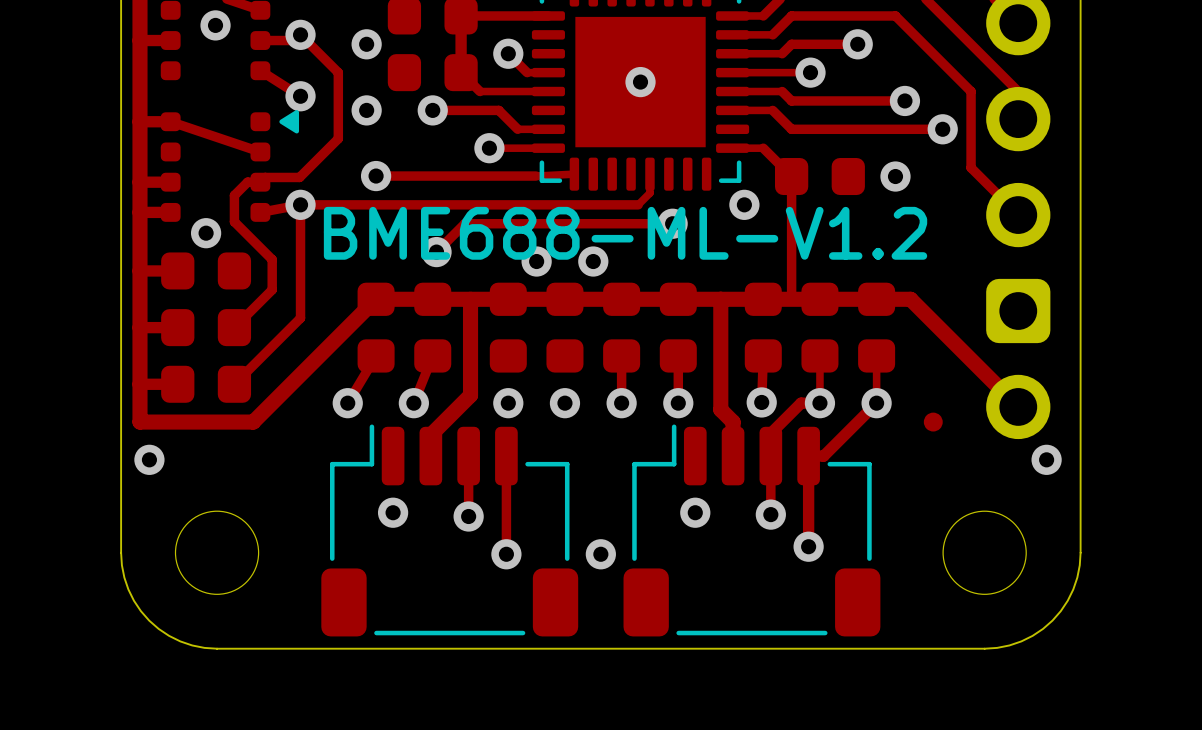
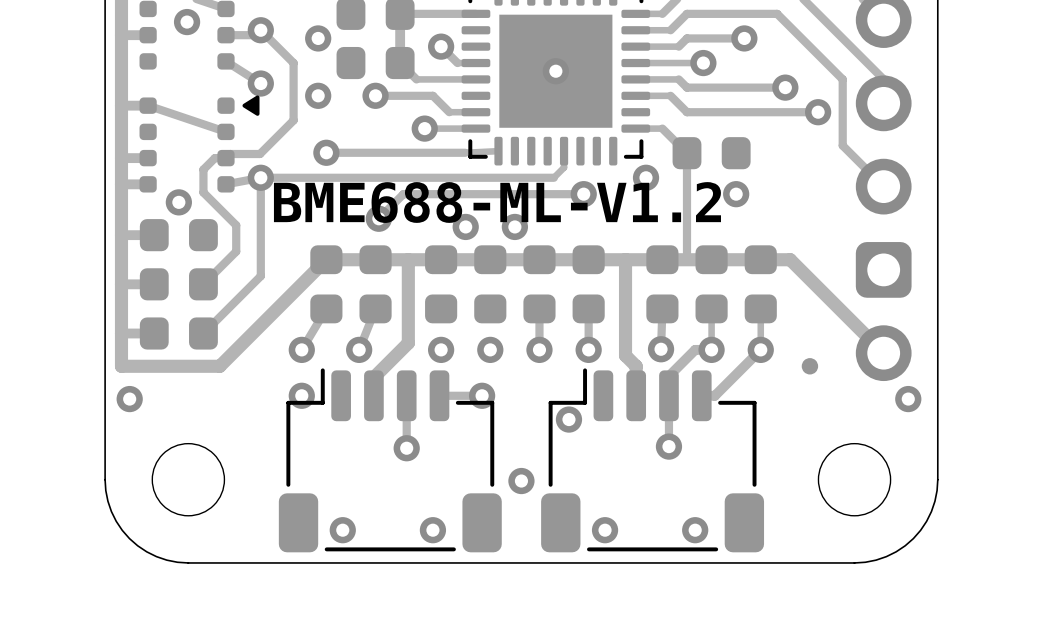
via position: (895, 176) -> (736, 194)
via: none -> (301, 395)
track: (506, 456) (506, 554) -> (439, 395) (482, 395)
via: none -> (482, 395)
track: (808, 456) (808, 546) -> none
via: none -> (568, 419)
via: (393, 512) -> none
via: (695, 512) -> none
via: (808, 546) -> none
via: (506, 554) -> none
via: none -> (342, 530)
via: none -> (432, 530)
via: none -> (605, 530)
via: none -> (695, 530)

